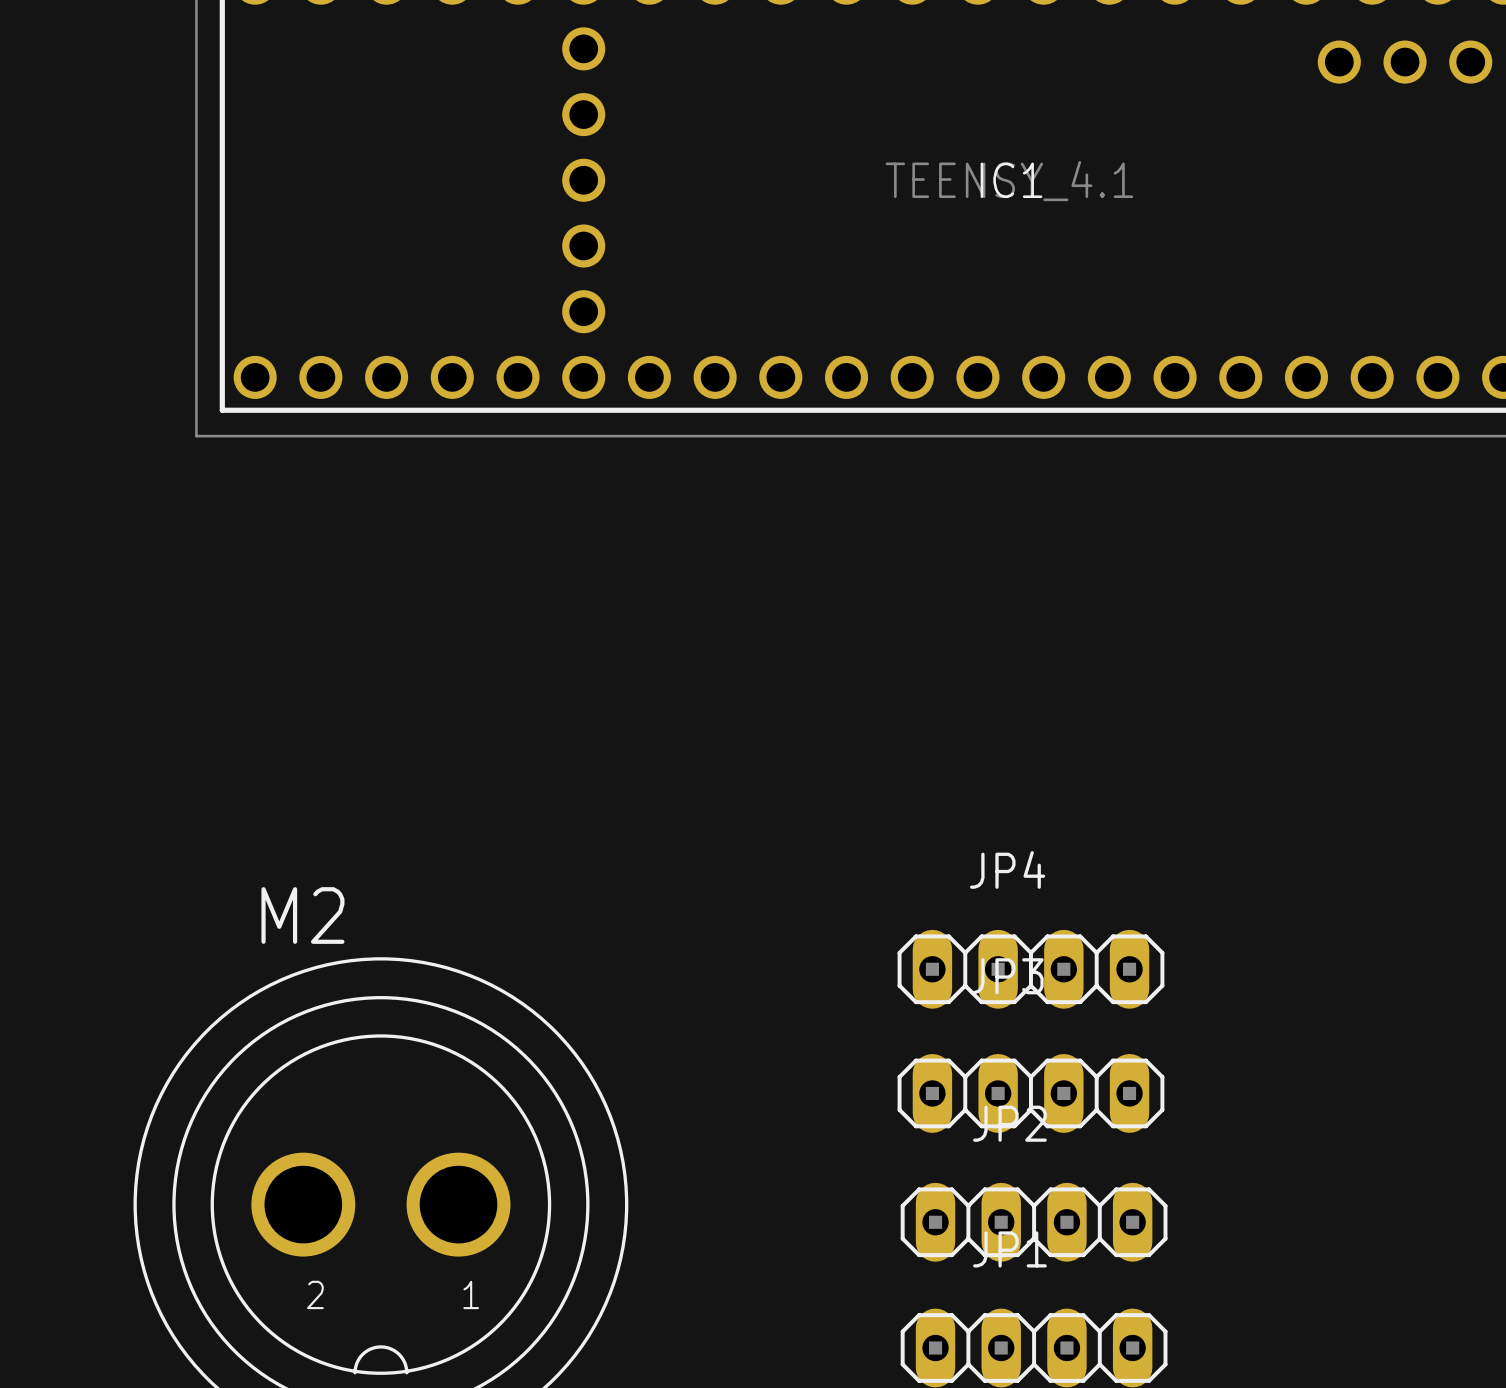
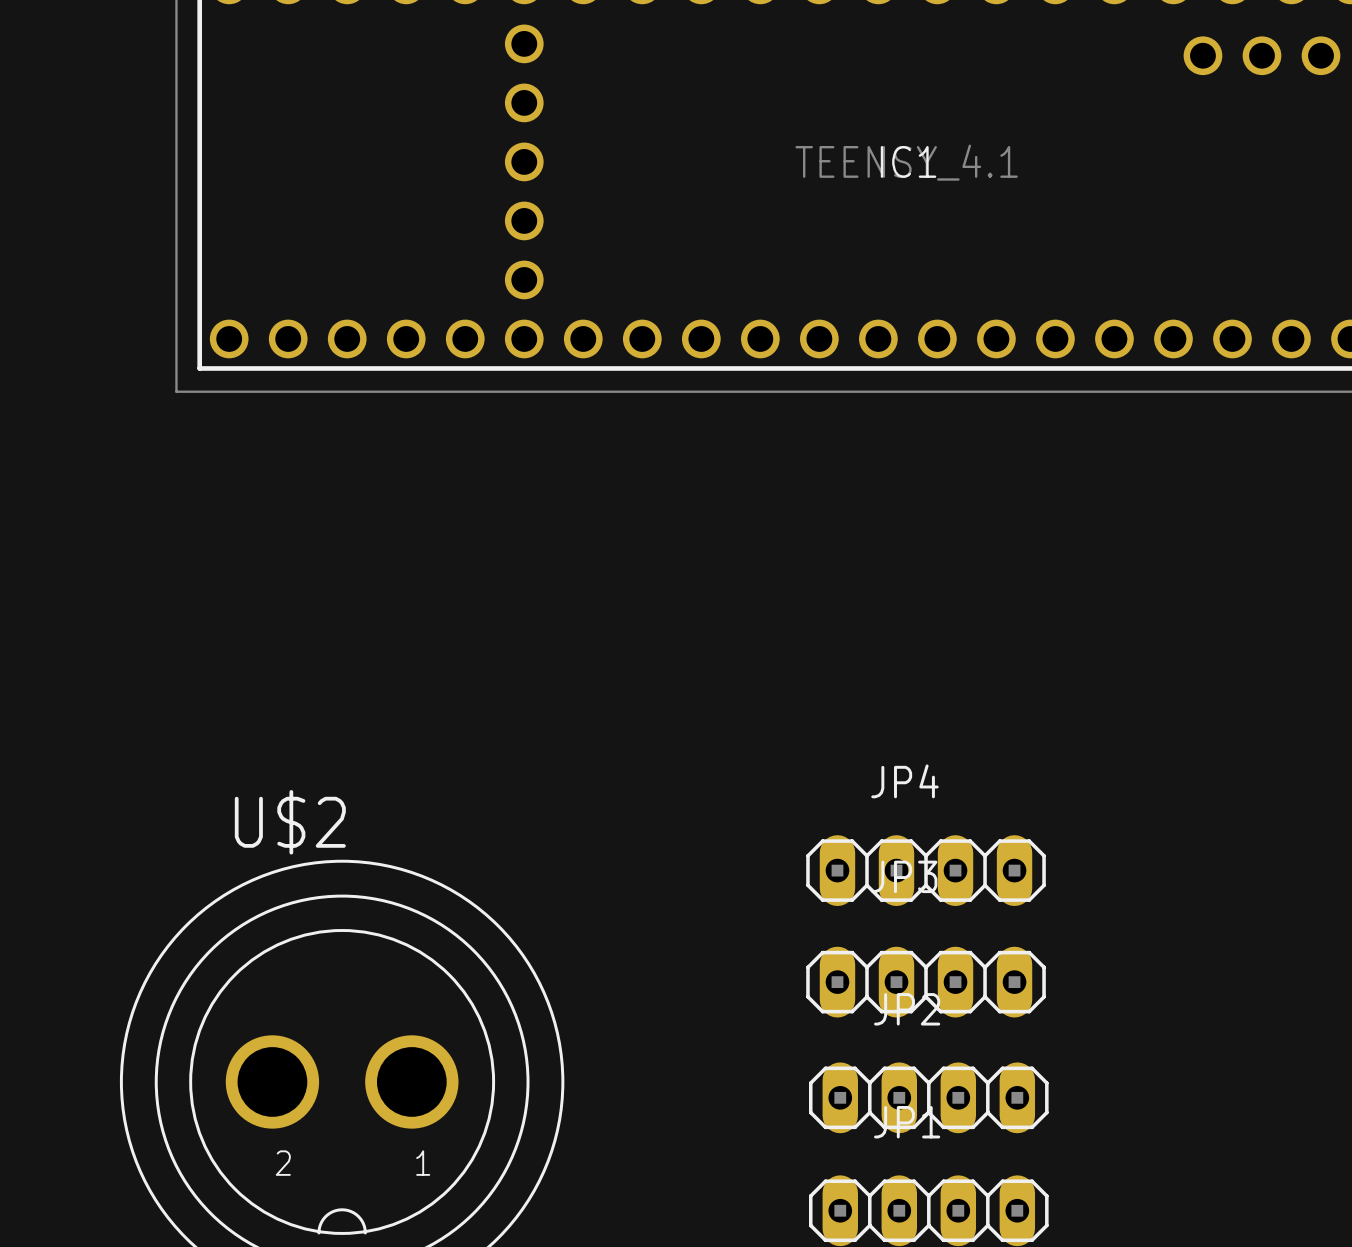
M2 name: M2 (302, 915) -> U$2 (290, 822)

